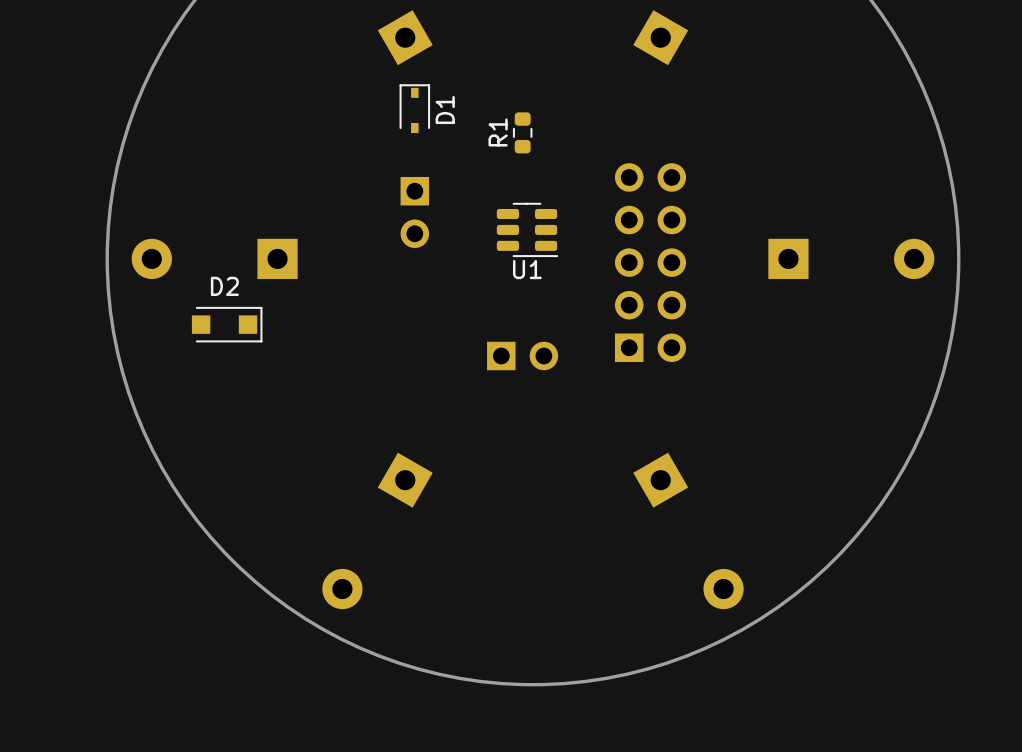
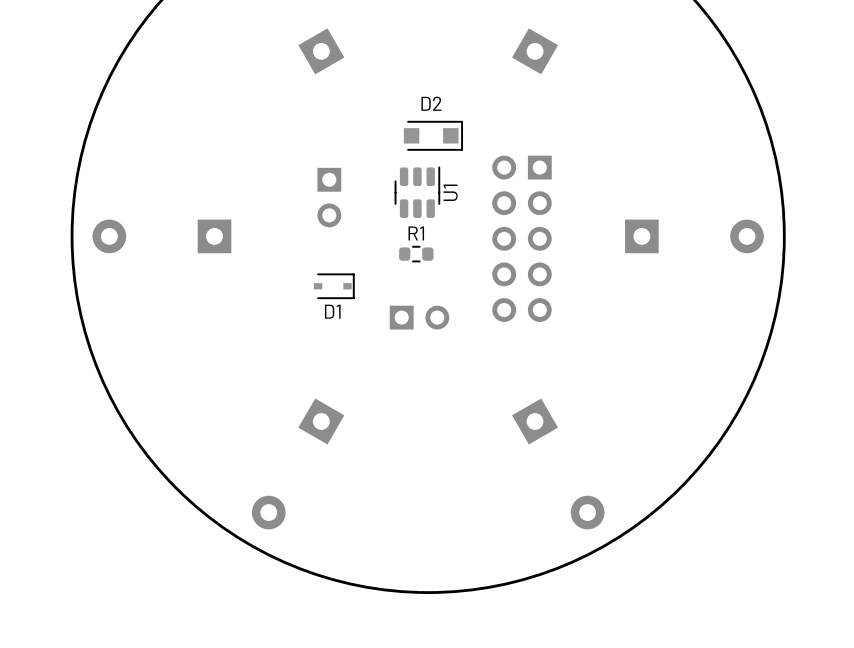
D1 rotation: 0° (414, 108) -> 90° clockwise (334, 286)
D1 position: (414, 108) -> (334, 286)
R1 rotation: 0° (522, 132) -> 90° clockwise (416, 254)
R1 position: (522, 132) -> (416, 254)
U1 rotation: 0° (527, 229) -> 90° counterclockwise (417, 192)
part rotation: 0° (650, 262) -> 180° (522, 238)
D2 position: (227, 324) -> (433, 135)

